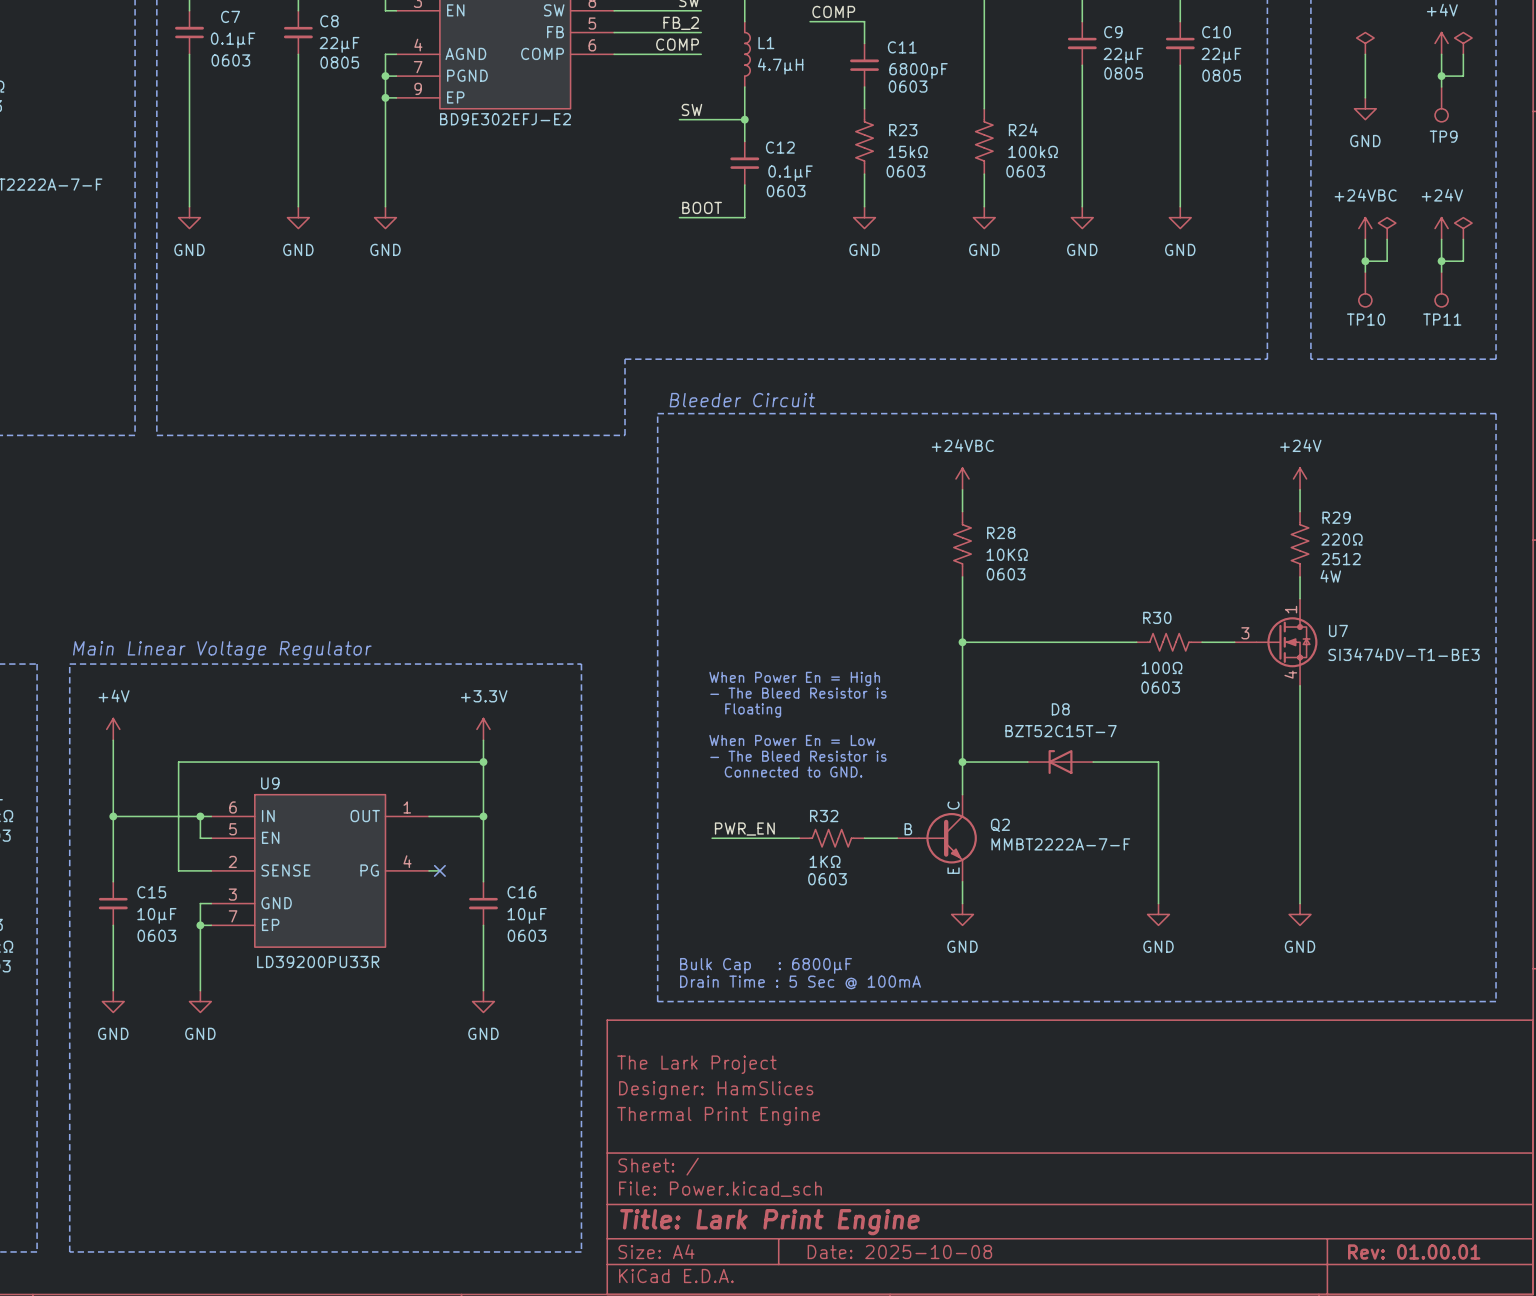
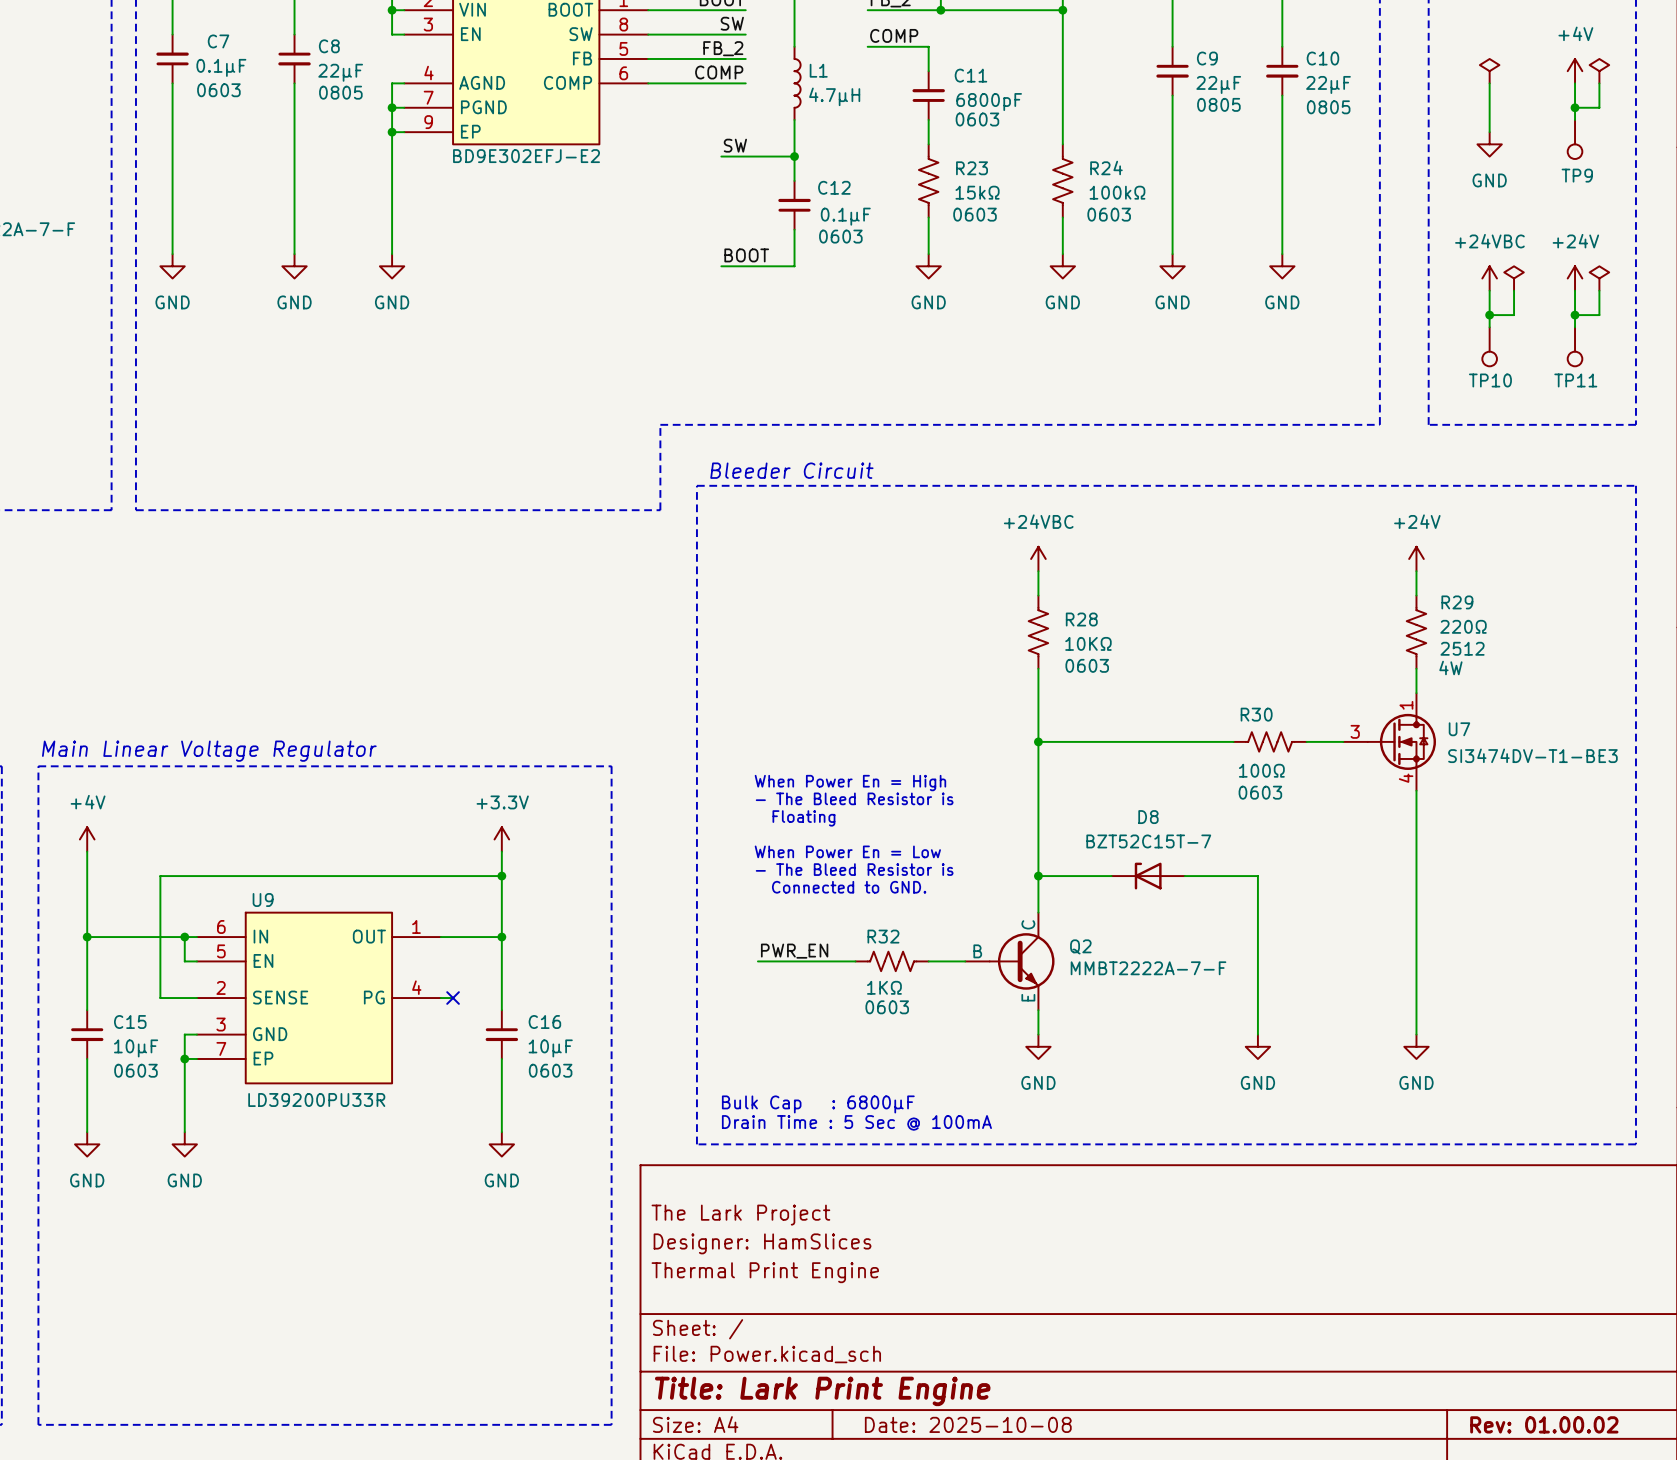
title block: Rev: 01.00.01 (1414, 1252) -> Rev: 01.00.02 (1544, 1424)

